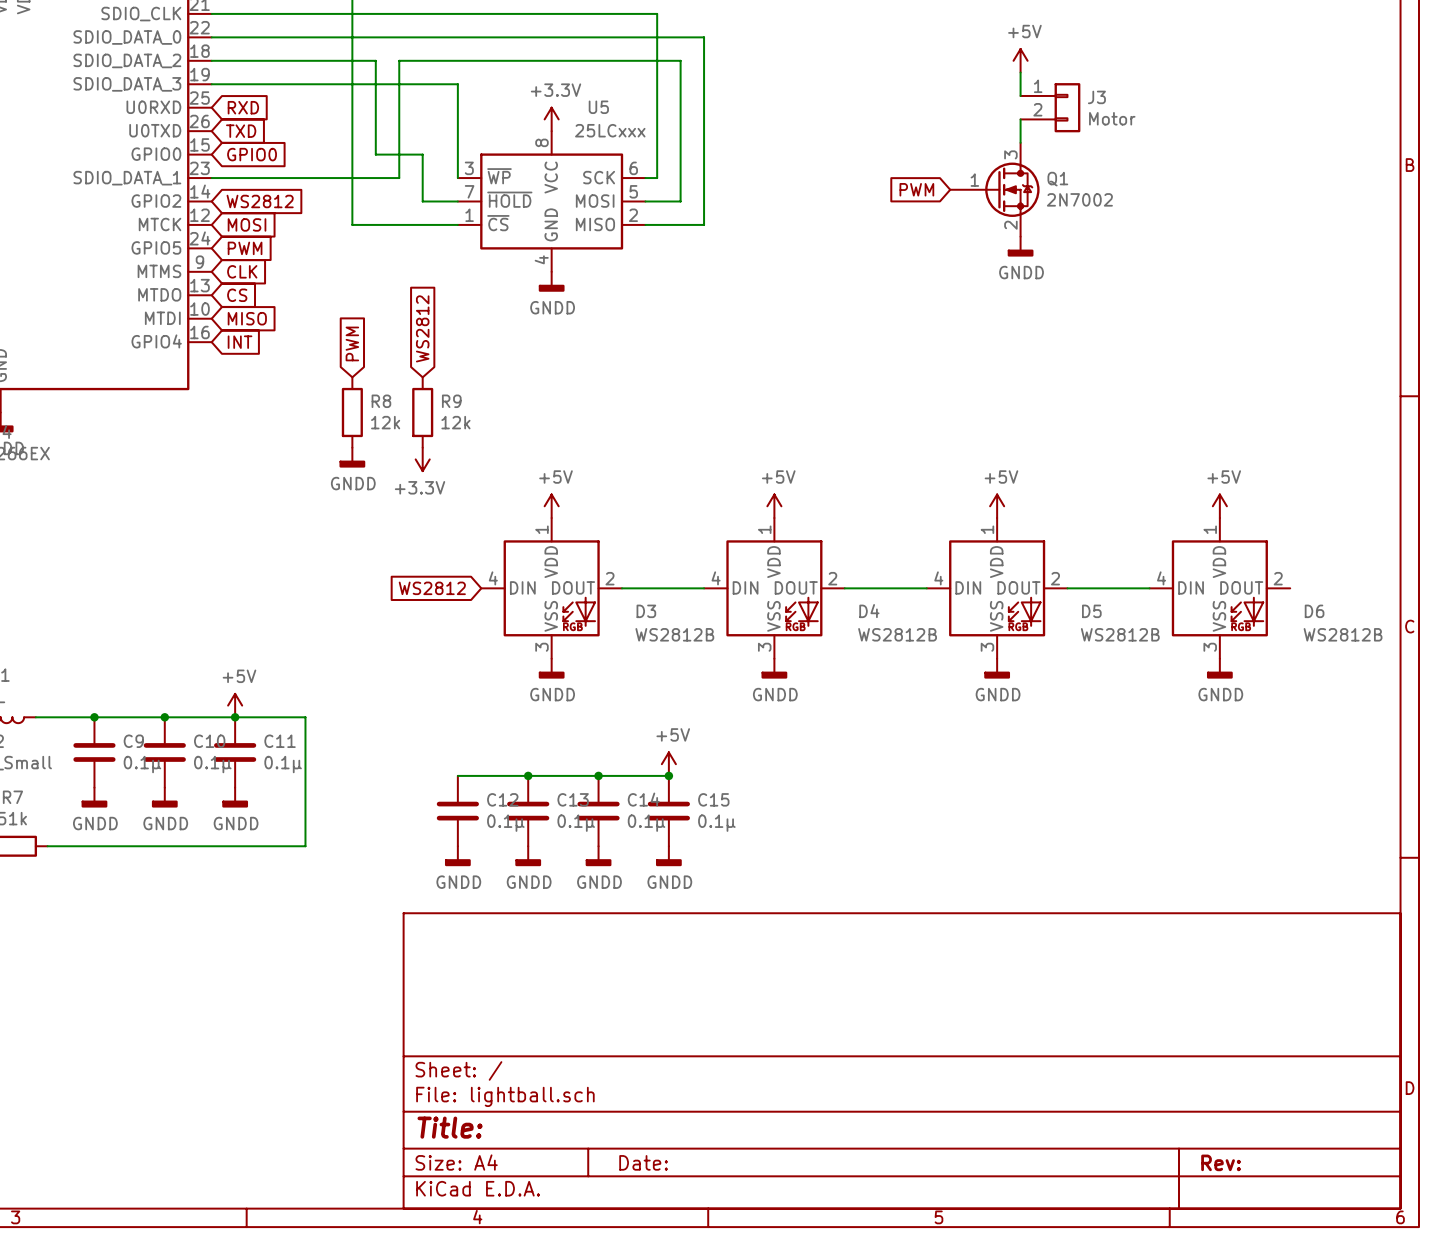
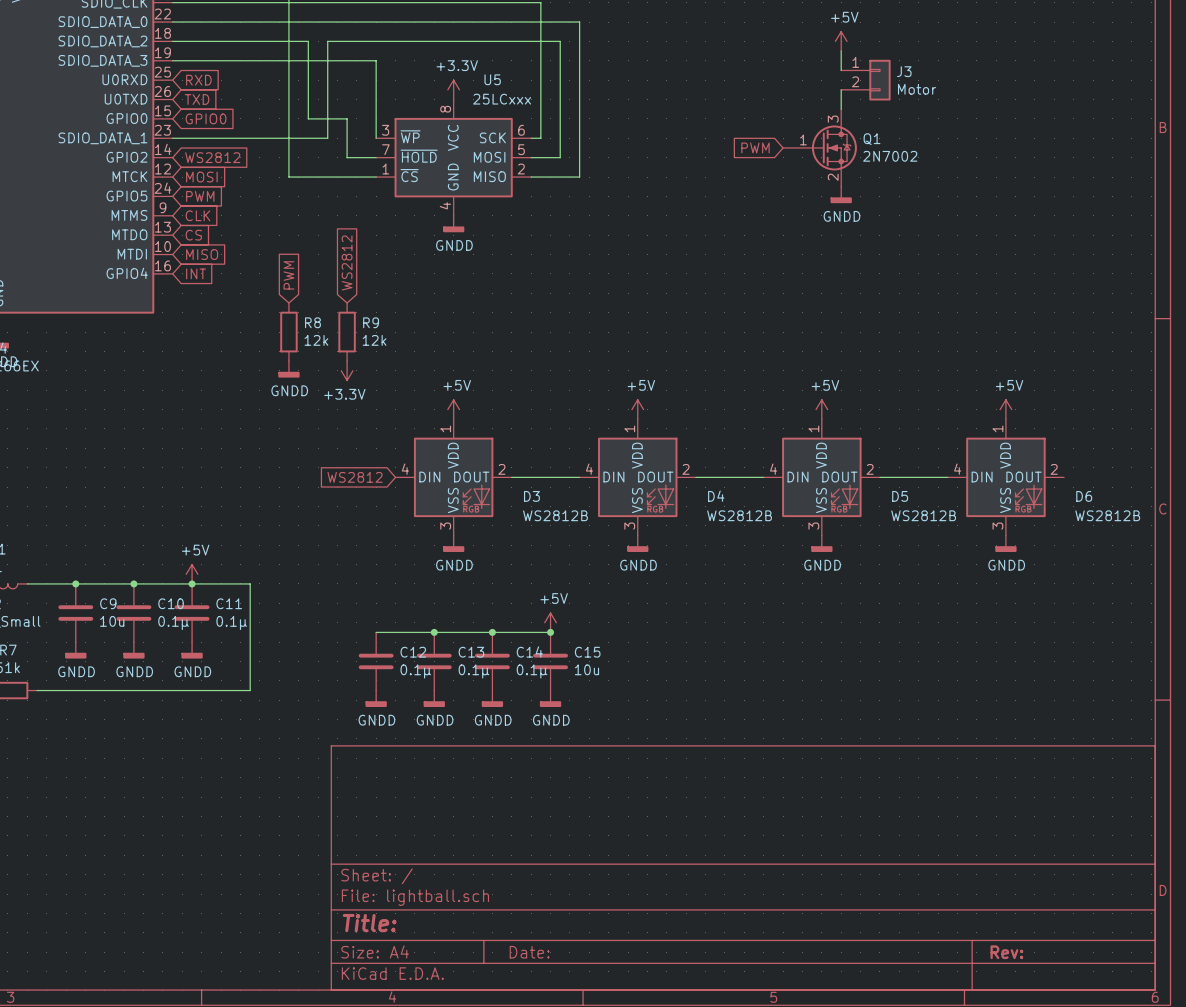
C9 value: 0.1µ (142, 764) -> 10u (112, 621)
C15 value: 0.1µ (716, 823) -> 10u (586, 669)

